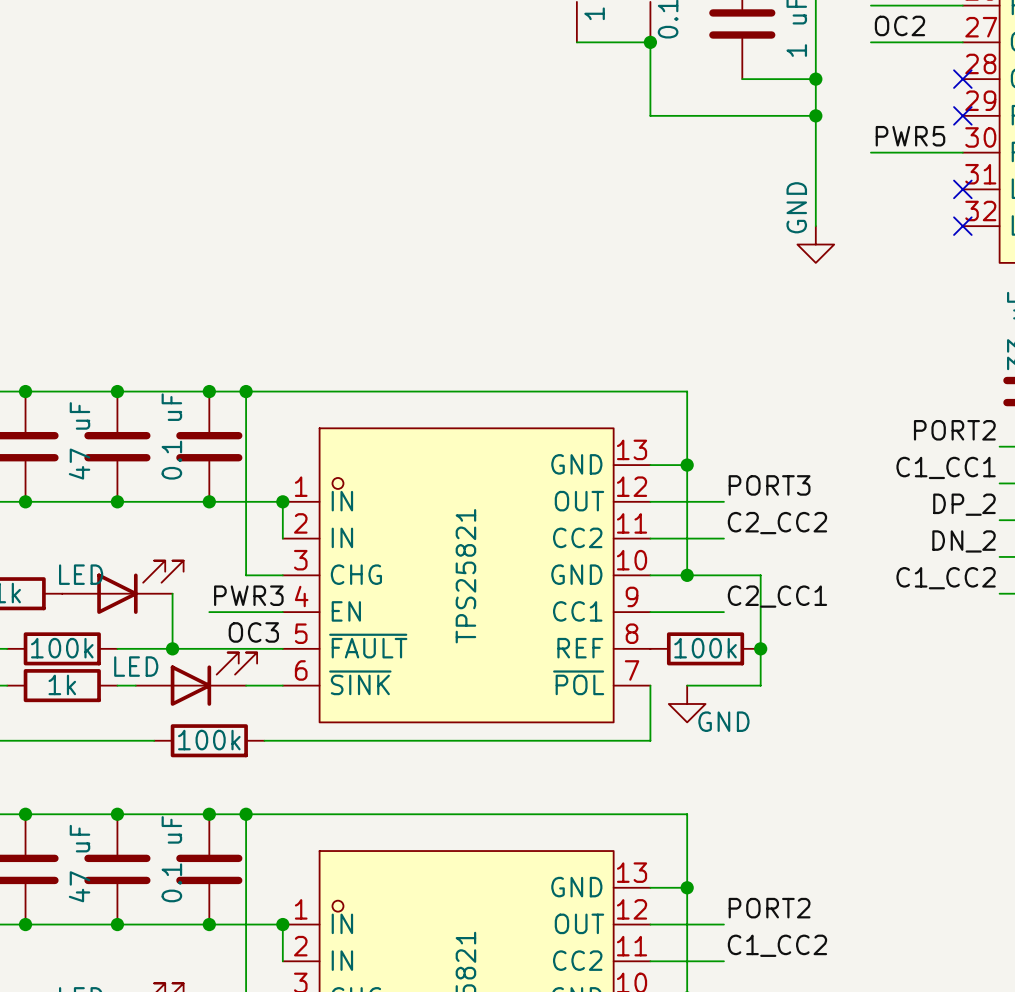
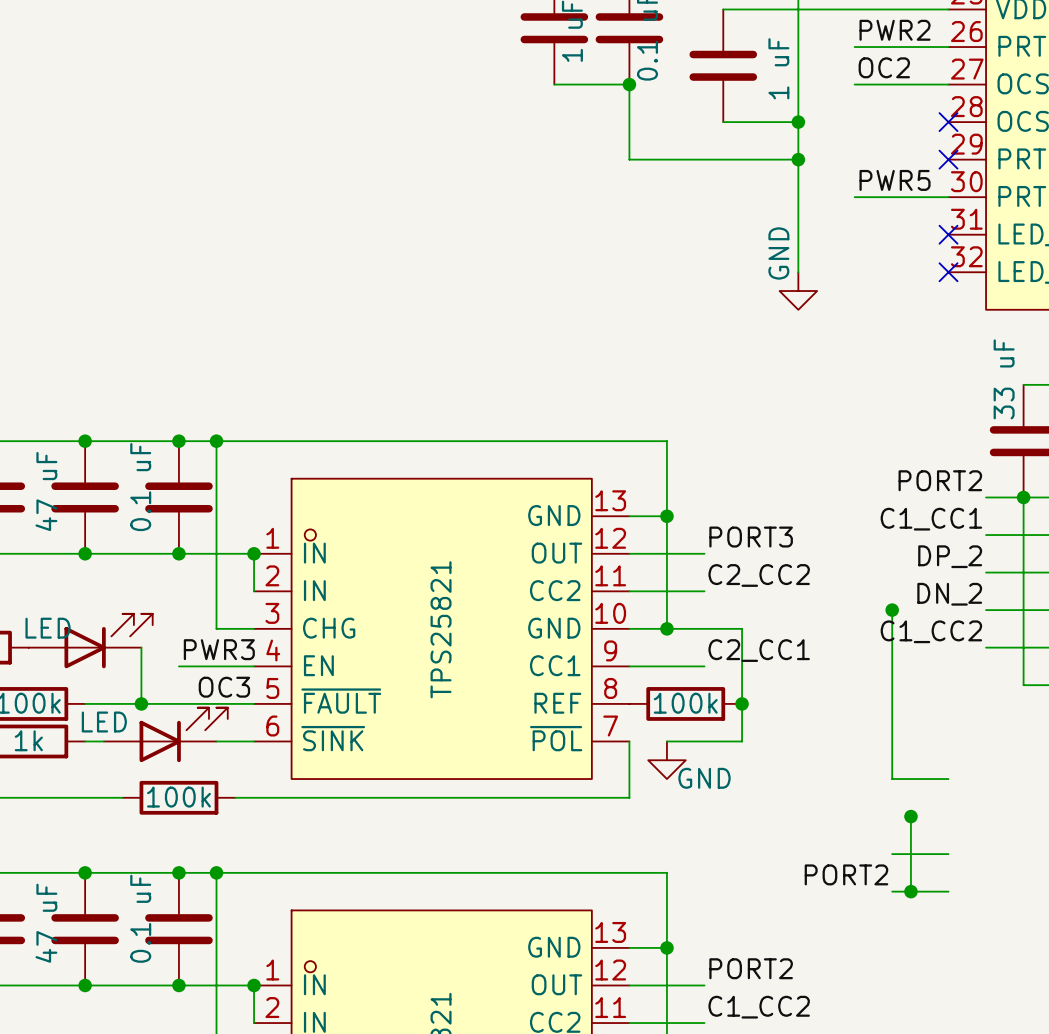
wire: none -> (892, 610) (892, 779) (948, 779)
junction: none -> (892, 610)
wire: none -> (910, 816) (910, 891)
junction: none -> (910, 816)
wire: none -> (892, 854) (948, 854)
label: none -> PORT2 (846, 874)
wire: none -> (892, 891) (948, 891)
junction: none -> (910, 891)

